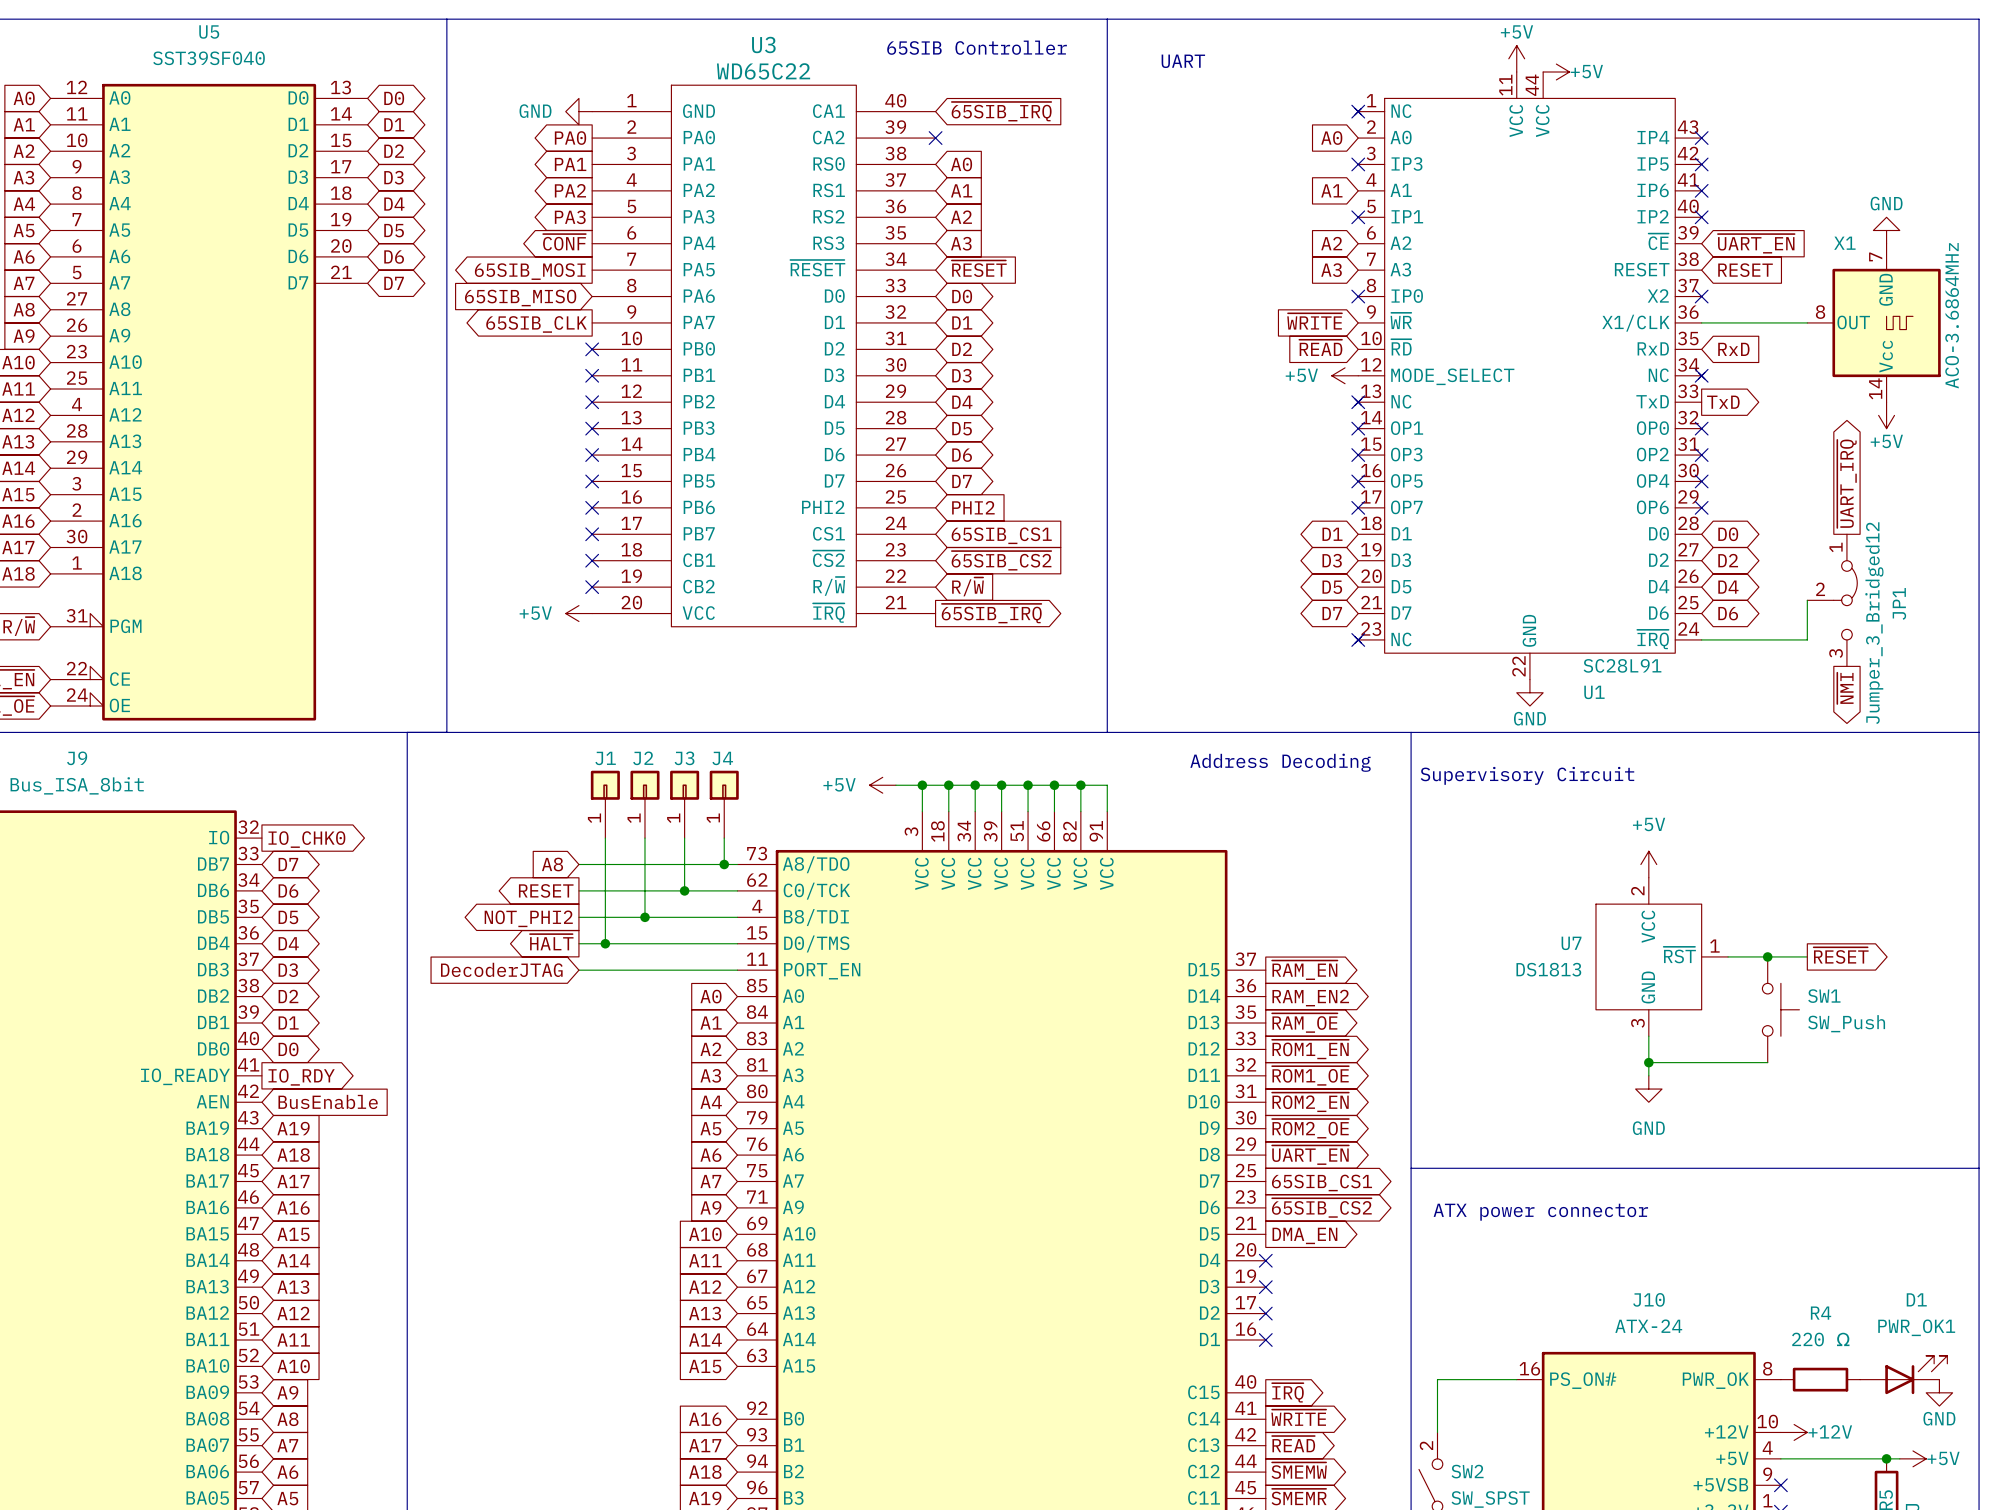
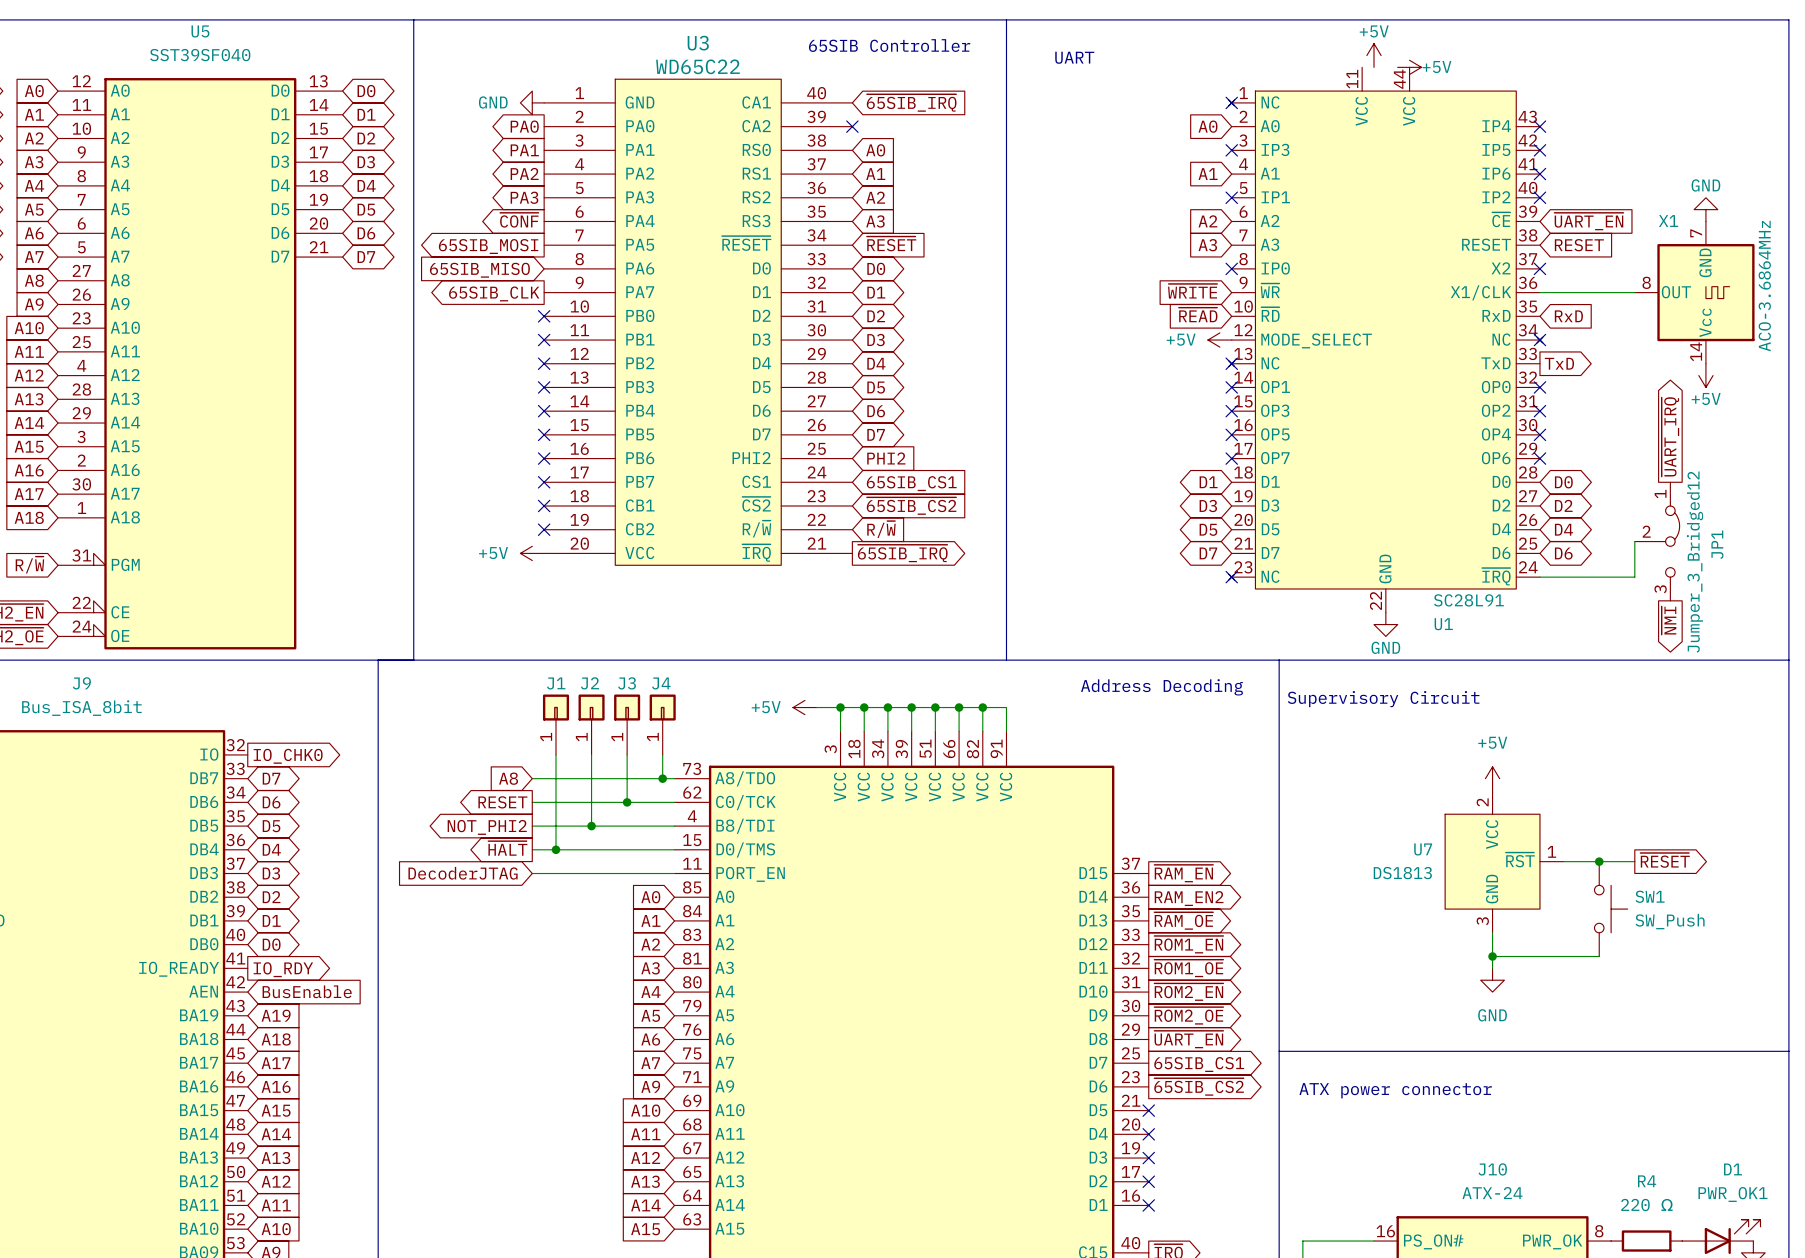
U1 symbol: [1355, 72, 1705, 680] -> [1228, 67, 1543, 613]
U3 symbol: [592, 85, 936, 627] -> [544, 79, 853, 566]
U7 symbol: [1595, 877, 1729, 1037] -> [1445, 790, 1564, 933]
no-connect mark: none -> (1148, 1110)
global label: DMA_EN (1304, 1235) -> none

